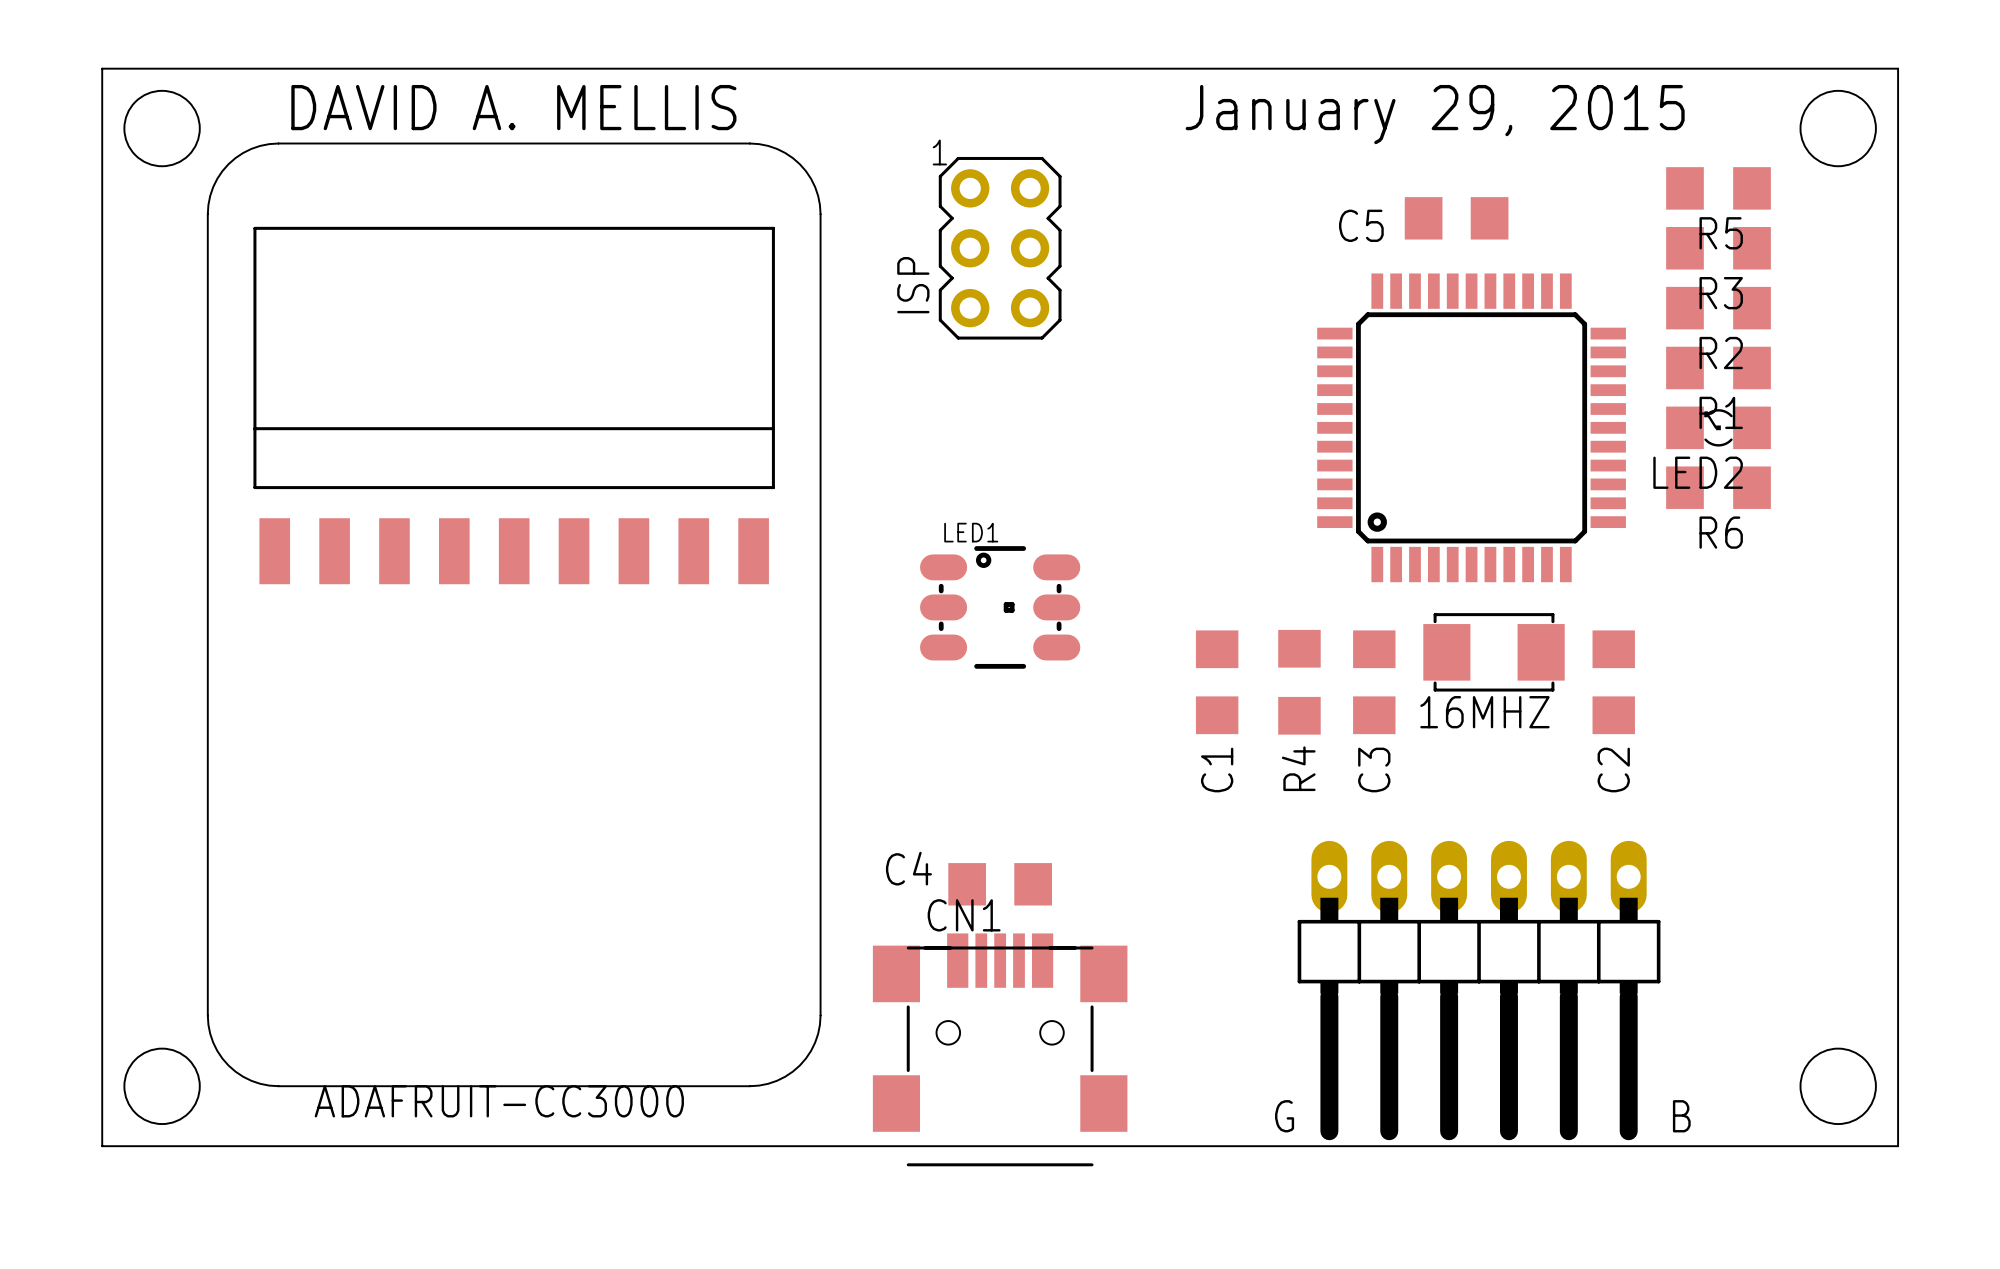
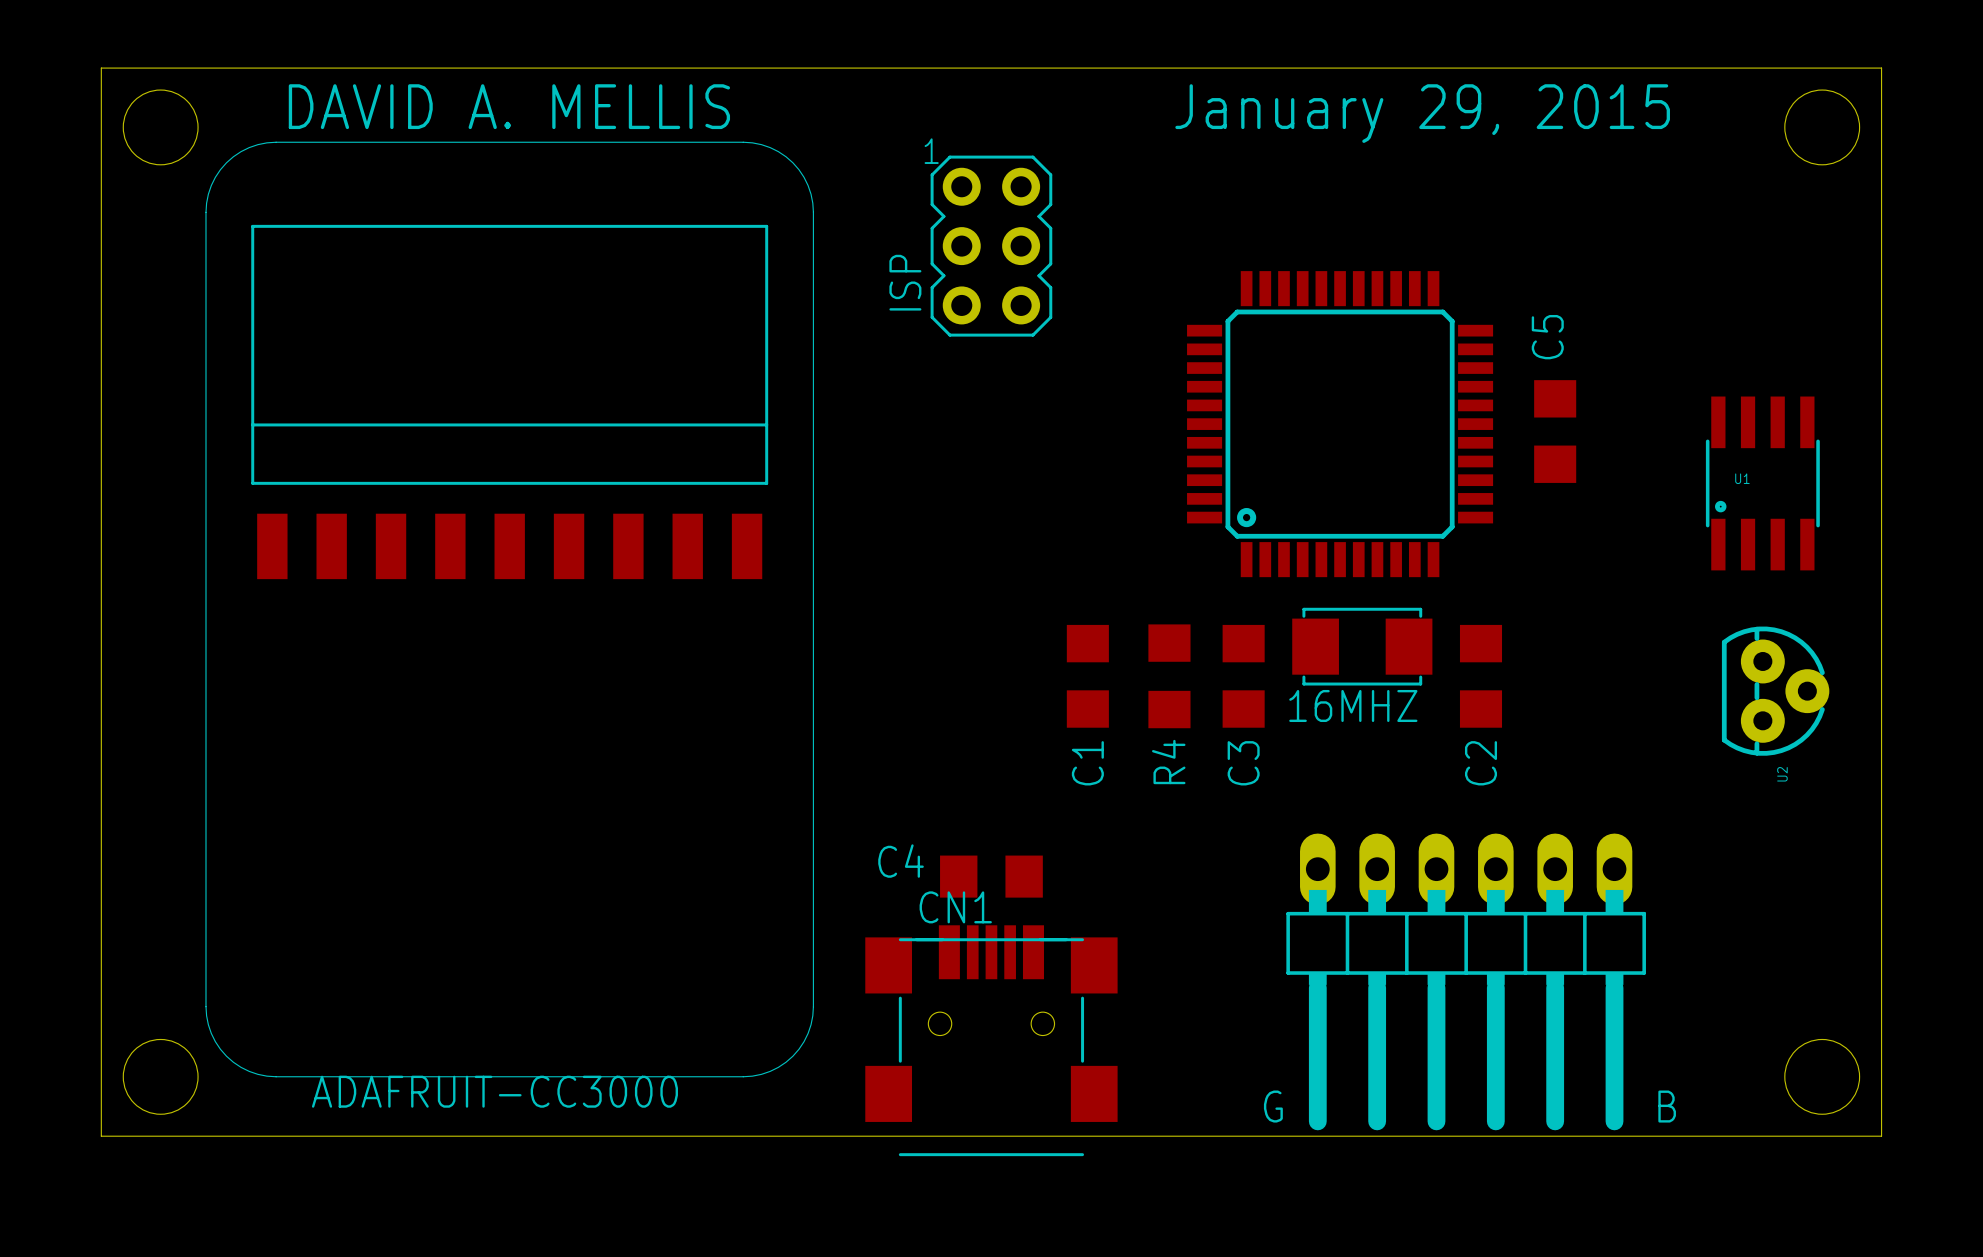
R5: (1718, 188) -> none
C5 rotation: 0° (1456, 218) -> 90° clockwise (1555, 431)
C5 position: (1456, 218) -> (1555, 431)
R3: (1718, 248) -> none
R2: (1718, 308) -> none
R1: (1718, 367) -> none
part position: (1471, 427) -> (1340, 424)
LED2: (1718, 427) -> none
R6: (1718, 487) -> none
U1: none -> (1762, 483)
LED1: (1000, 607) -> none
16MHZ position: (1494, 652) -> (1362, 646)
C1 position: (1217, 682) -> (1087, 676)
R4 position: (1299, 682) -> (1169, 676)
C3 position: (1374, 682) -> (1243, 676)
C2 position: (1613, 682) -> (1480, 676)
U2: none -> (1775, 691)

